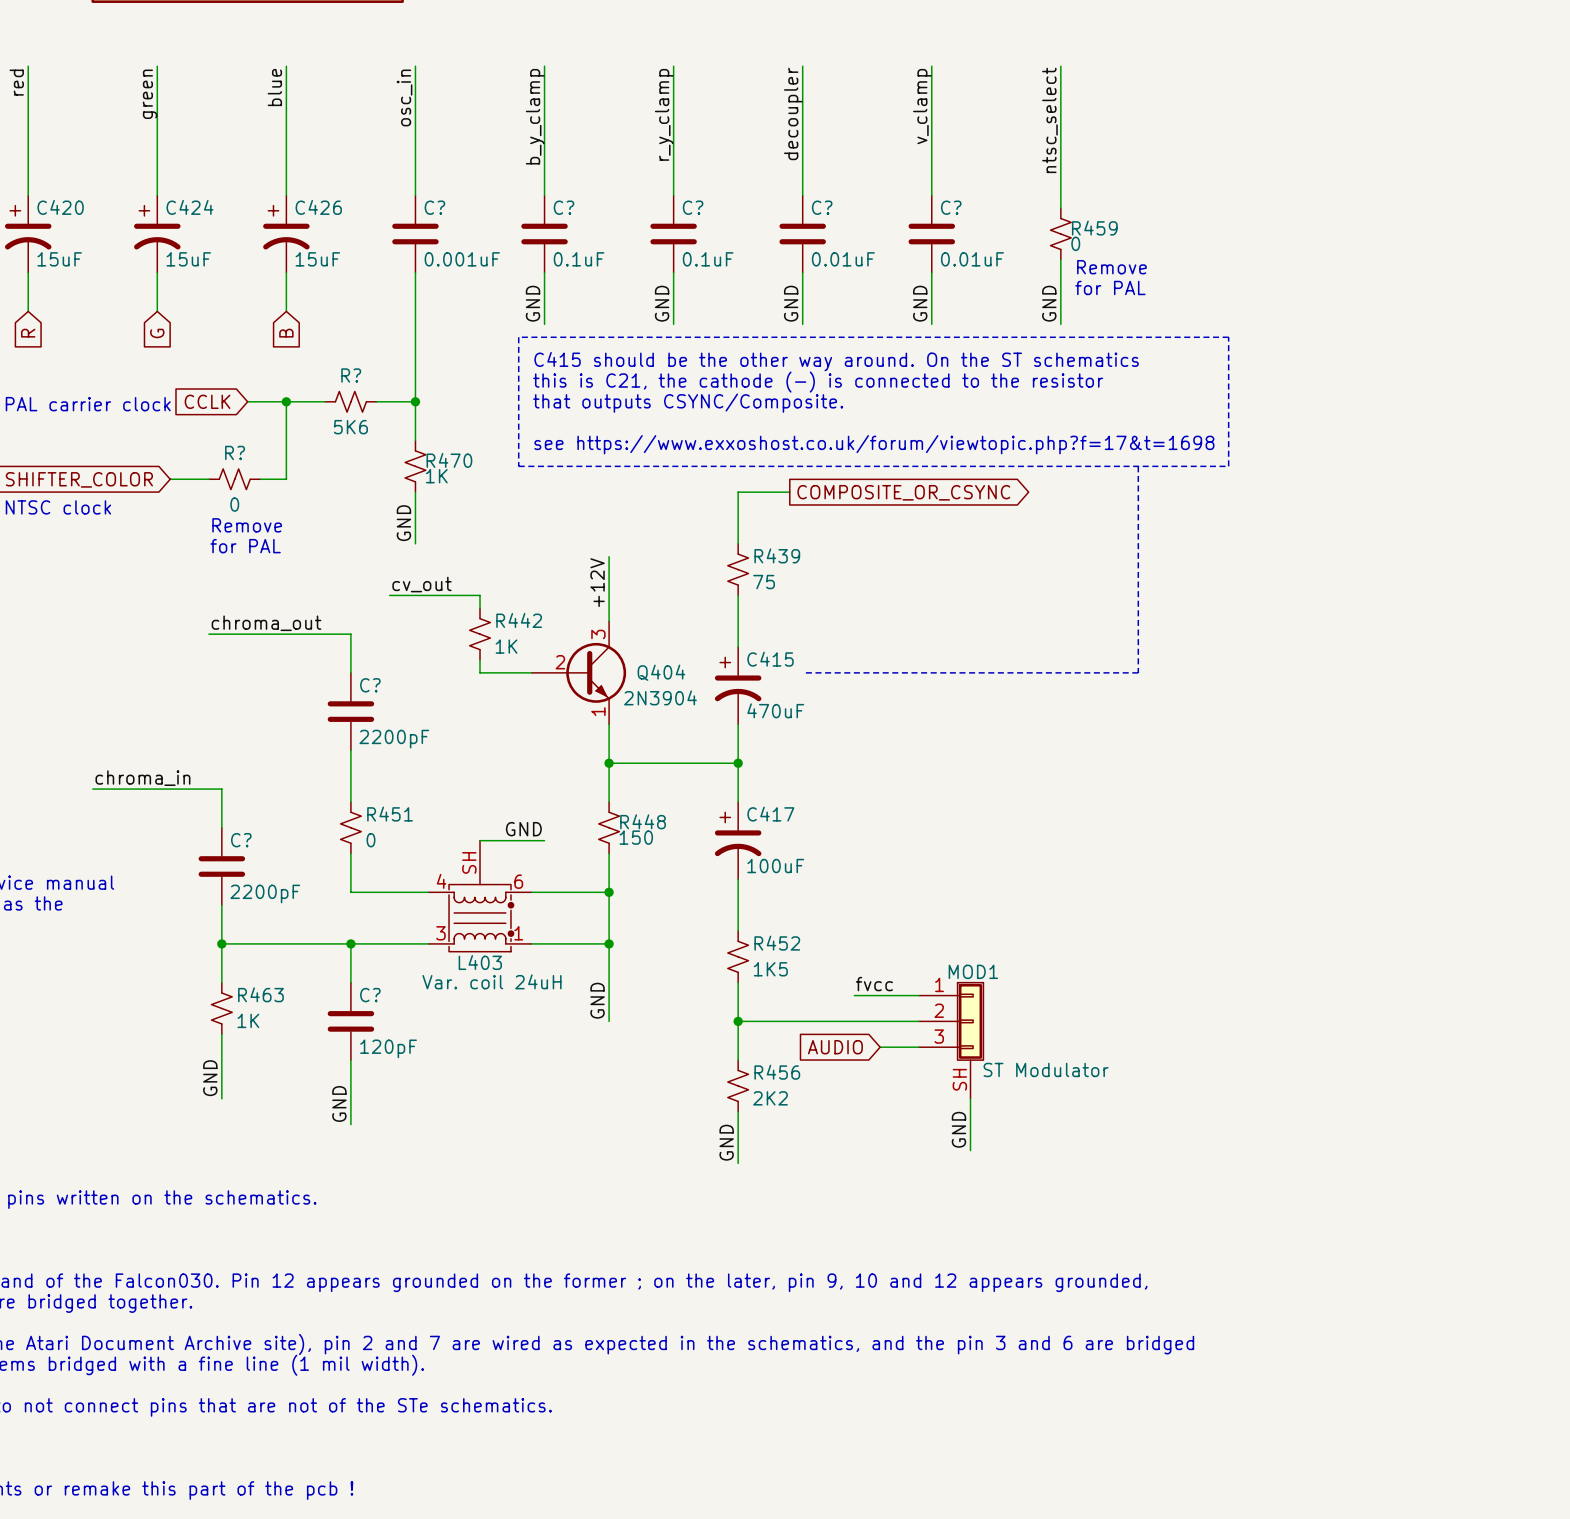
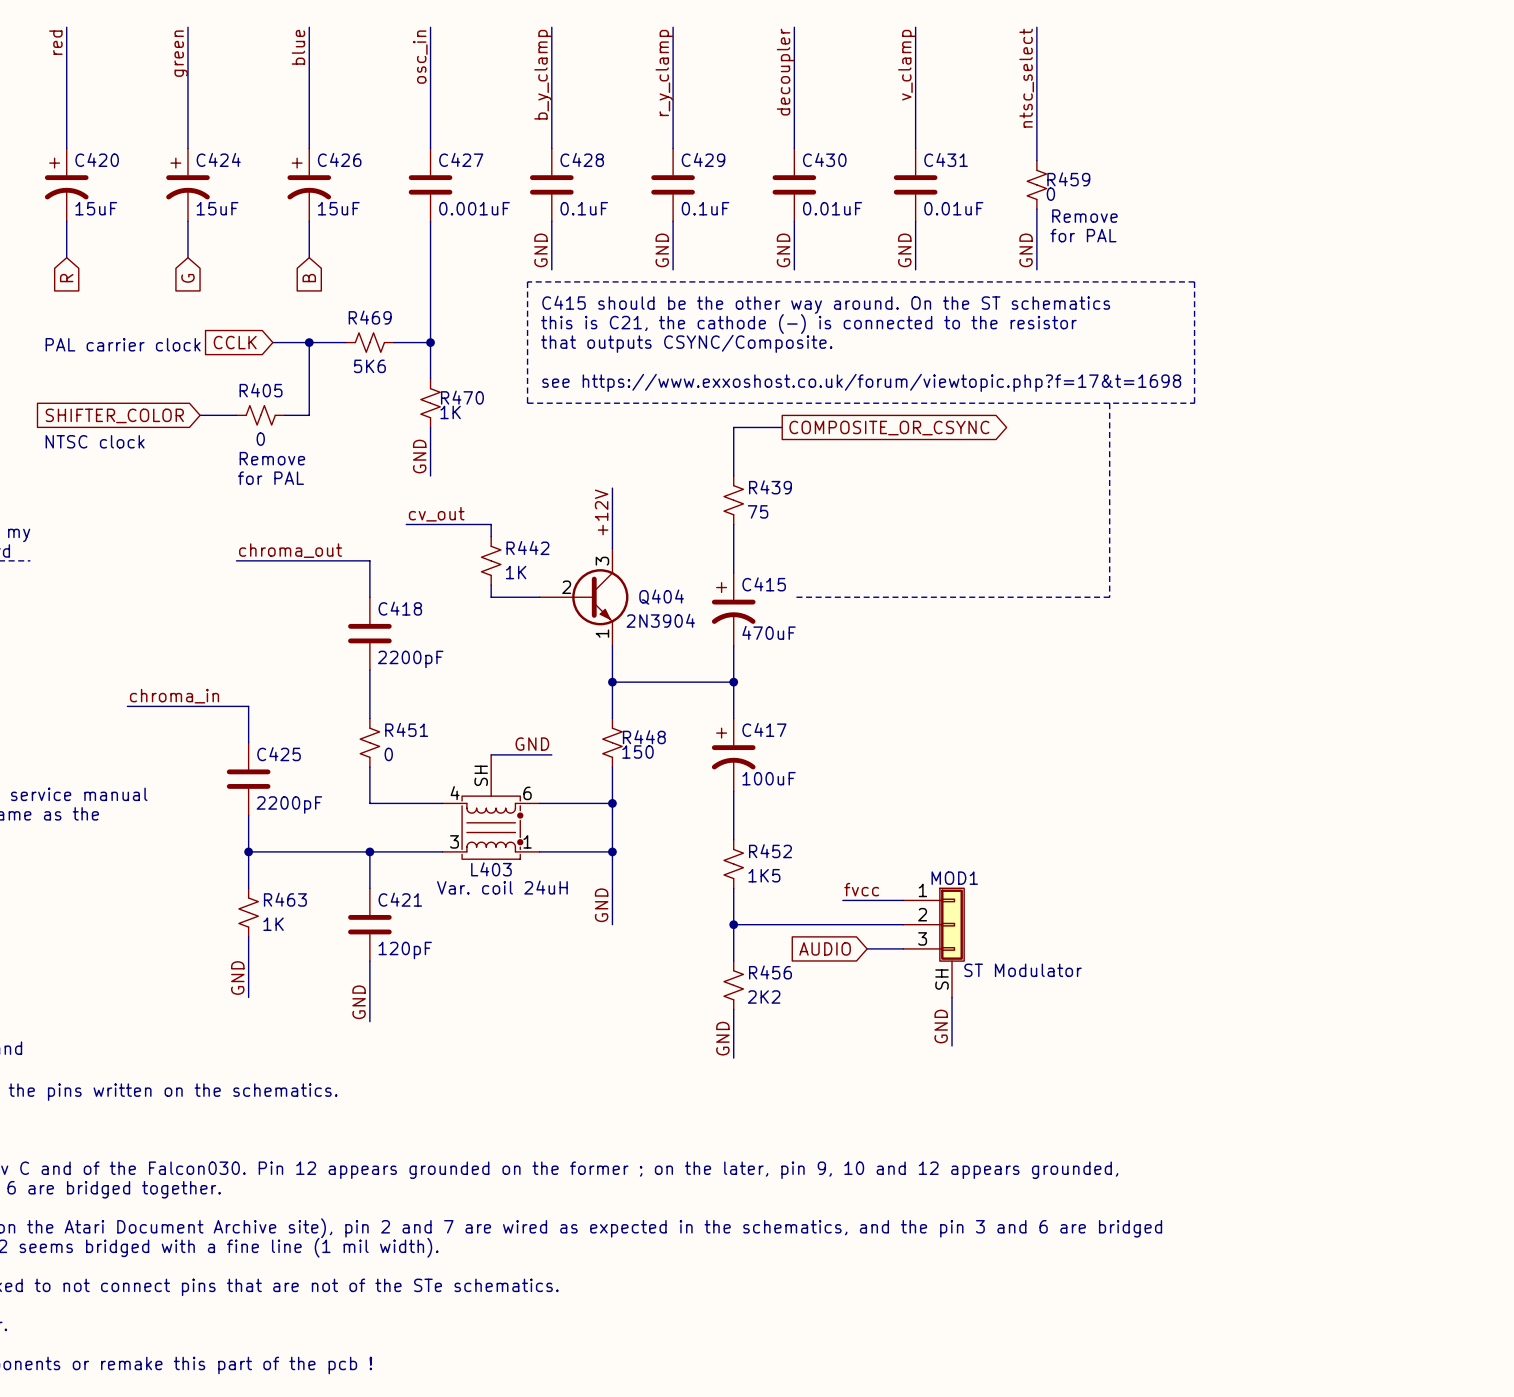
C? name: C? (434, 207) -> C427 (461, 159)
C? name: C? (564, 207) -> C428 (582, 159)
C? name: C? (693, 207) -> C429 (703, 159)
C? name: C? (822, 207) -> C430 (824, 159)
C? name: C? (951, 207) -> C431 (946, 159)
R? name: R? (351, 375) -> R469 (370, 317)
R? name: R? (235, 452) -> R405 (261, 390)
C? name: C? (370, 685) -> C418 (400, 608)
C? name: C? (241, 840) -> C425 (279, 754)
C? name: C? (370, 995) -> C421 (400, 899)

